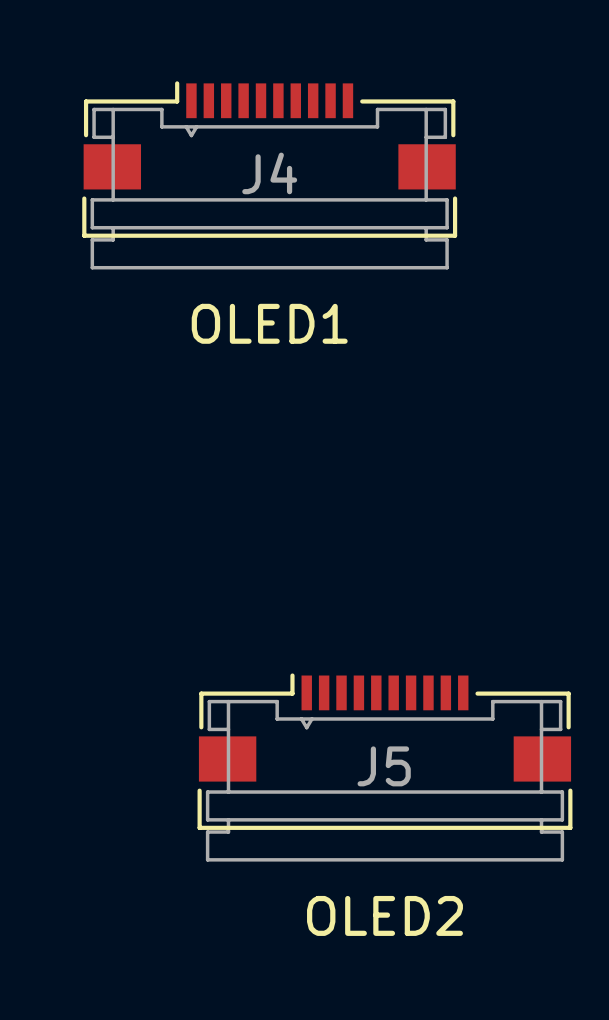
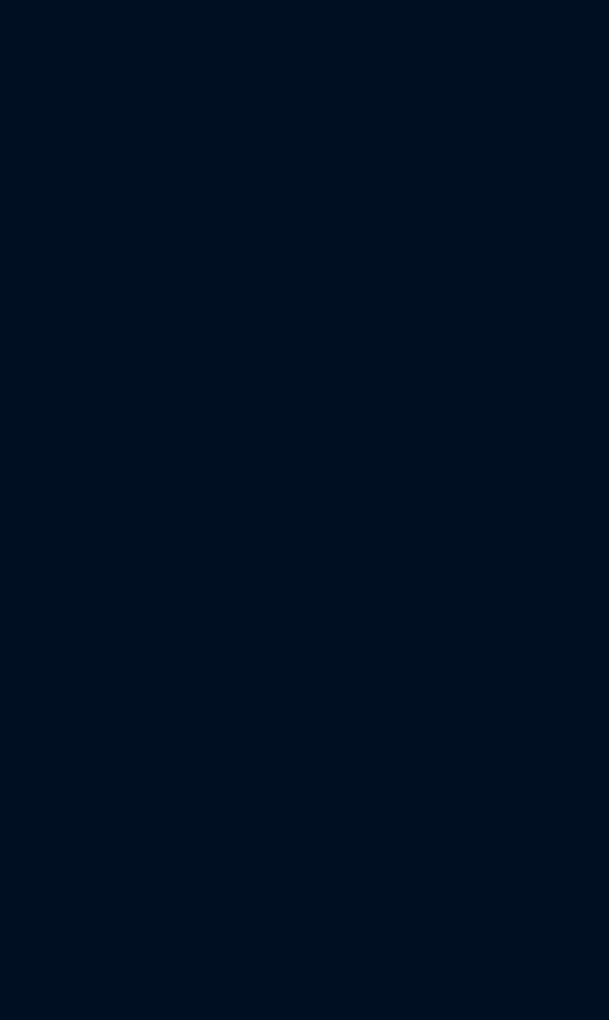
J4: OLED1 (269, 175) -> none
J5: OLED2 (384, 767) -> none

